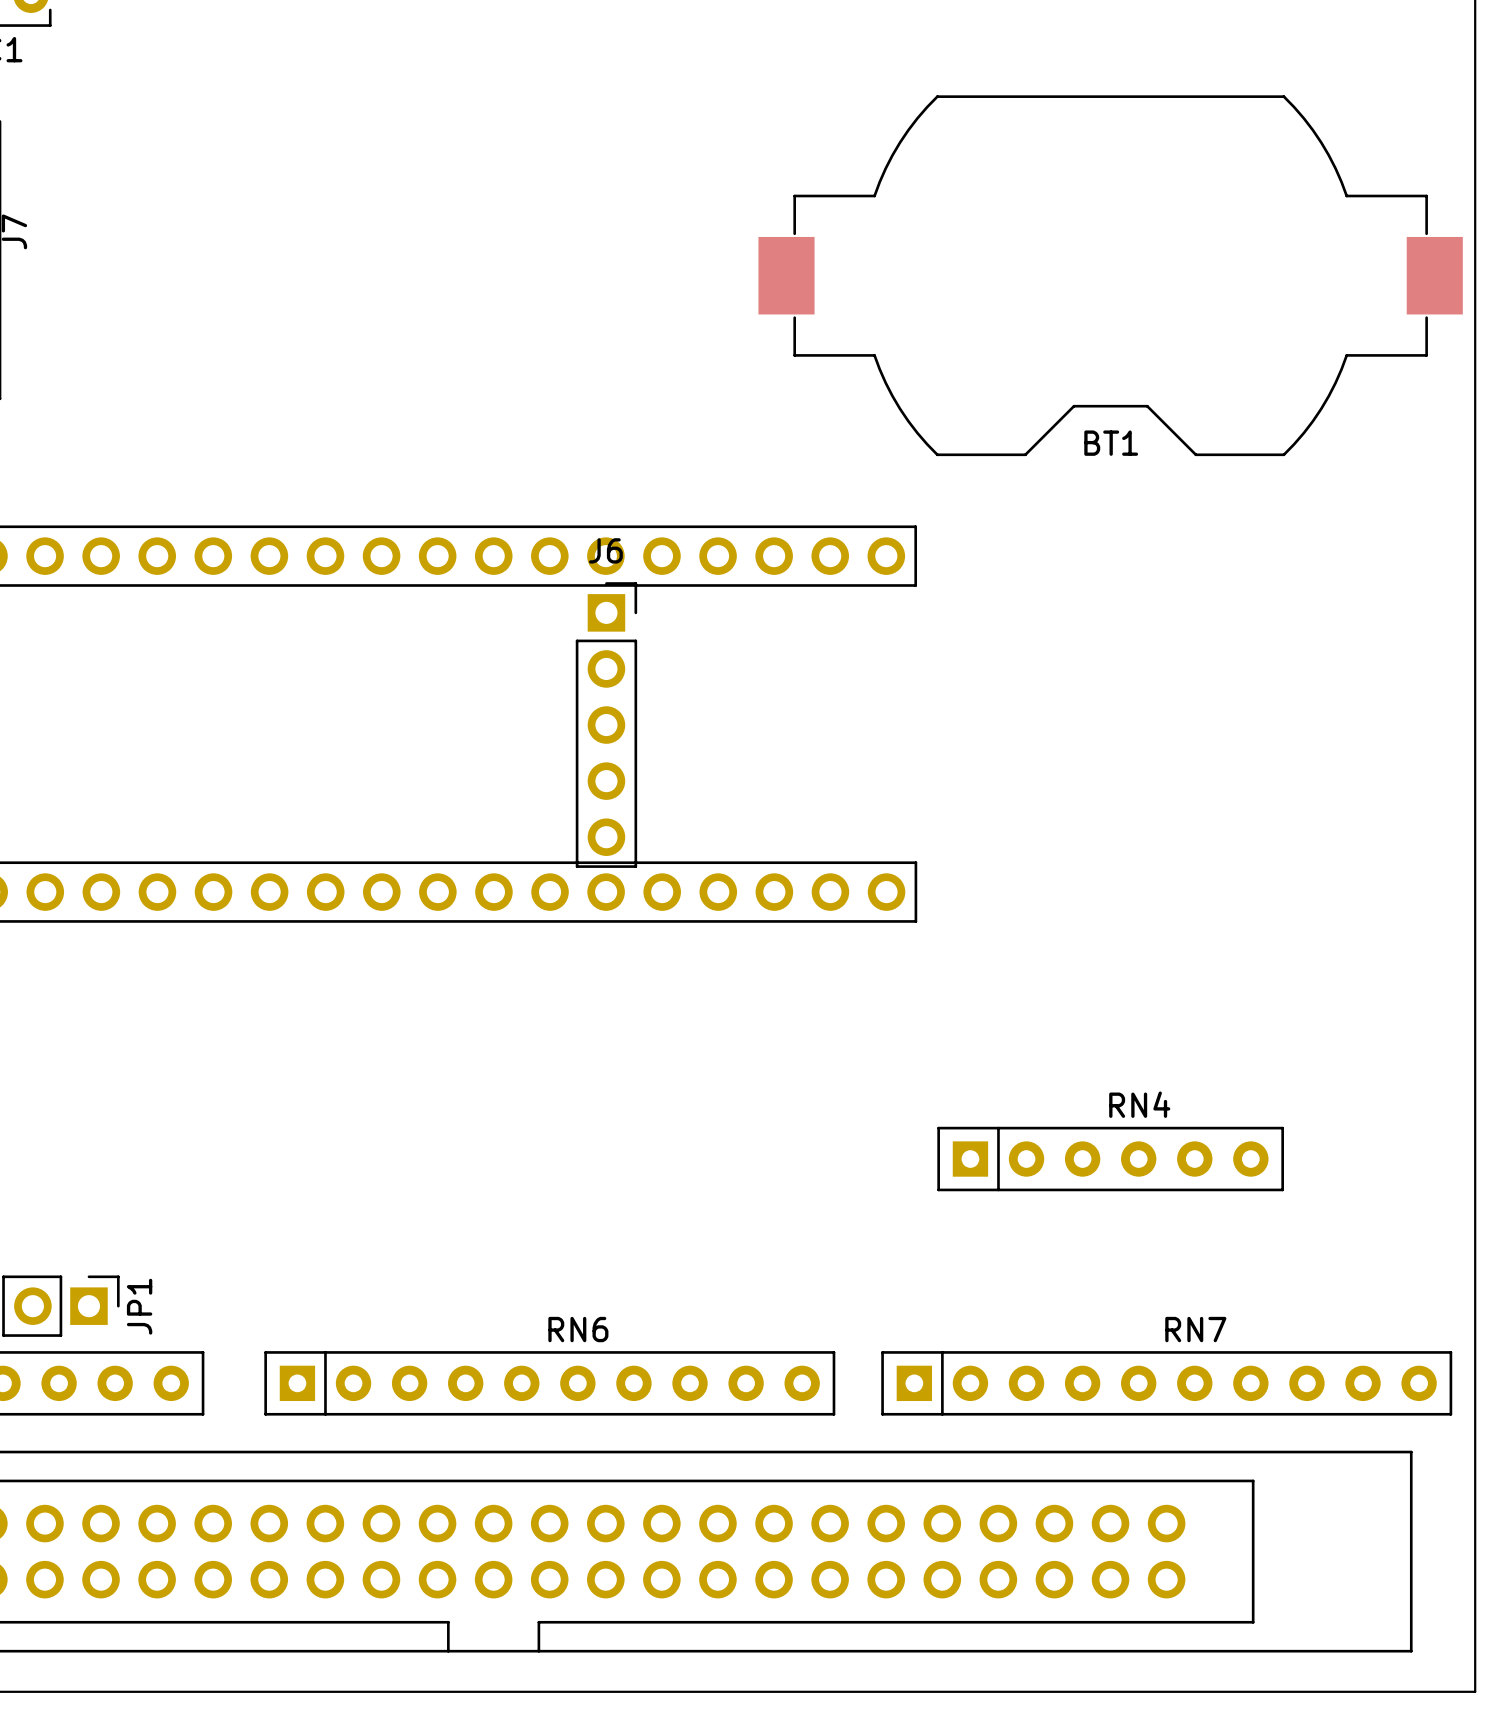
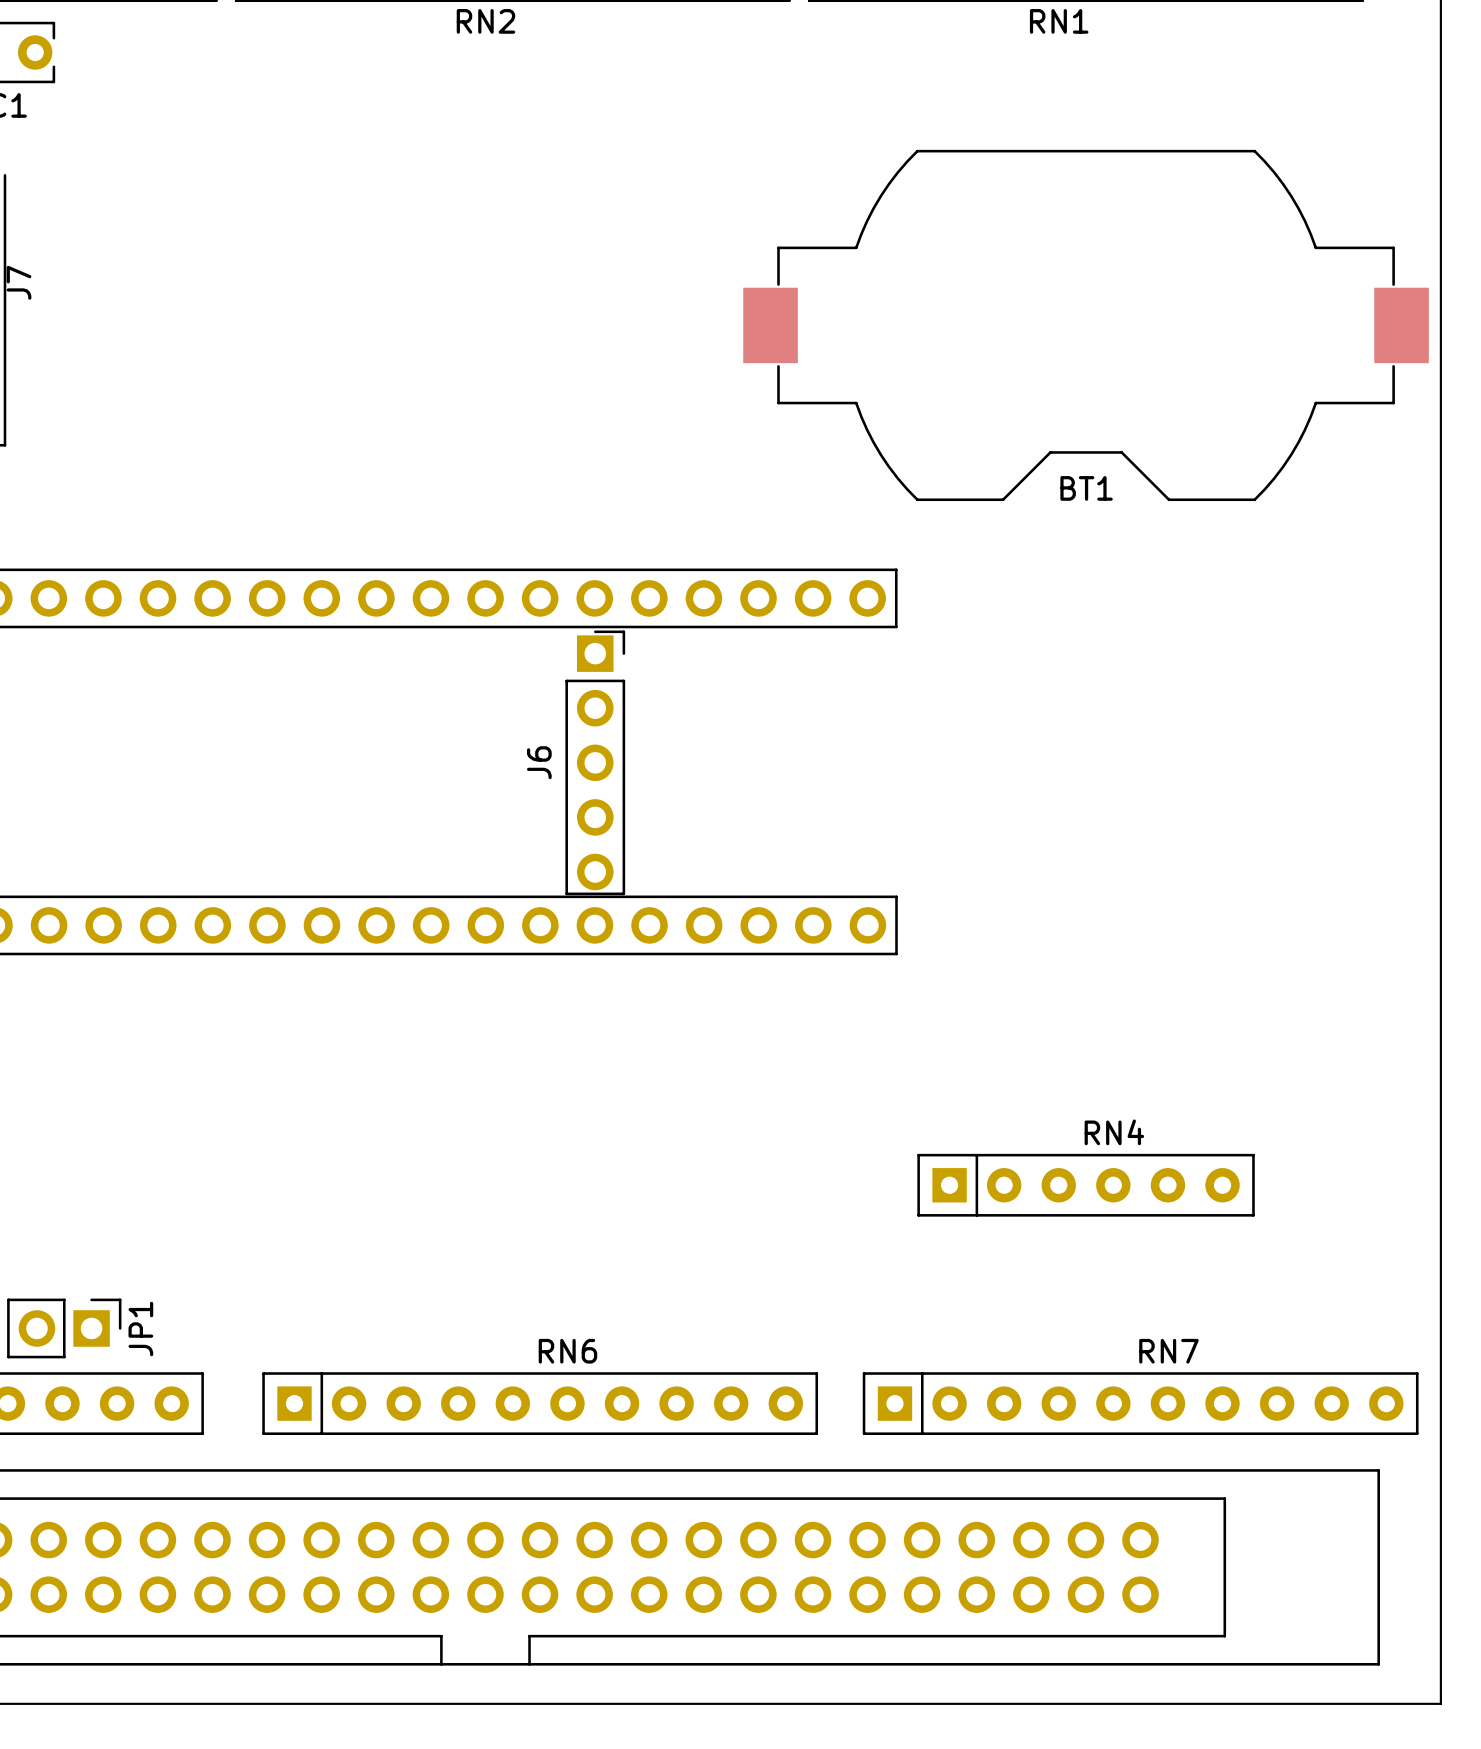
J6 name rotation: 0° (605, 550) -> 90° counterclockwise (539, 762)
J6 name position: J6 (605, 550) -> J6 (539, 762)
J6 footprint: [575, 582, 638, 868] -> [565, 630, 626, 896]

